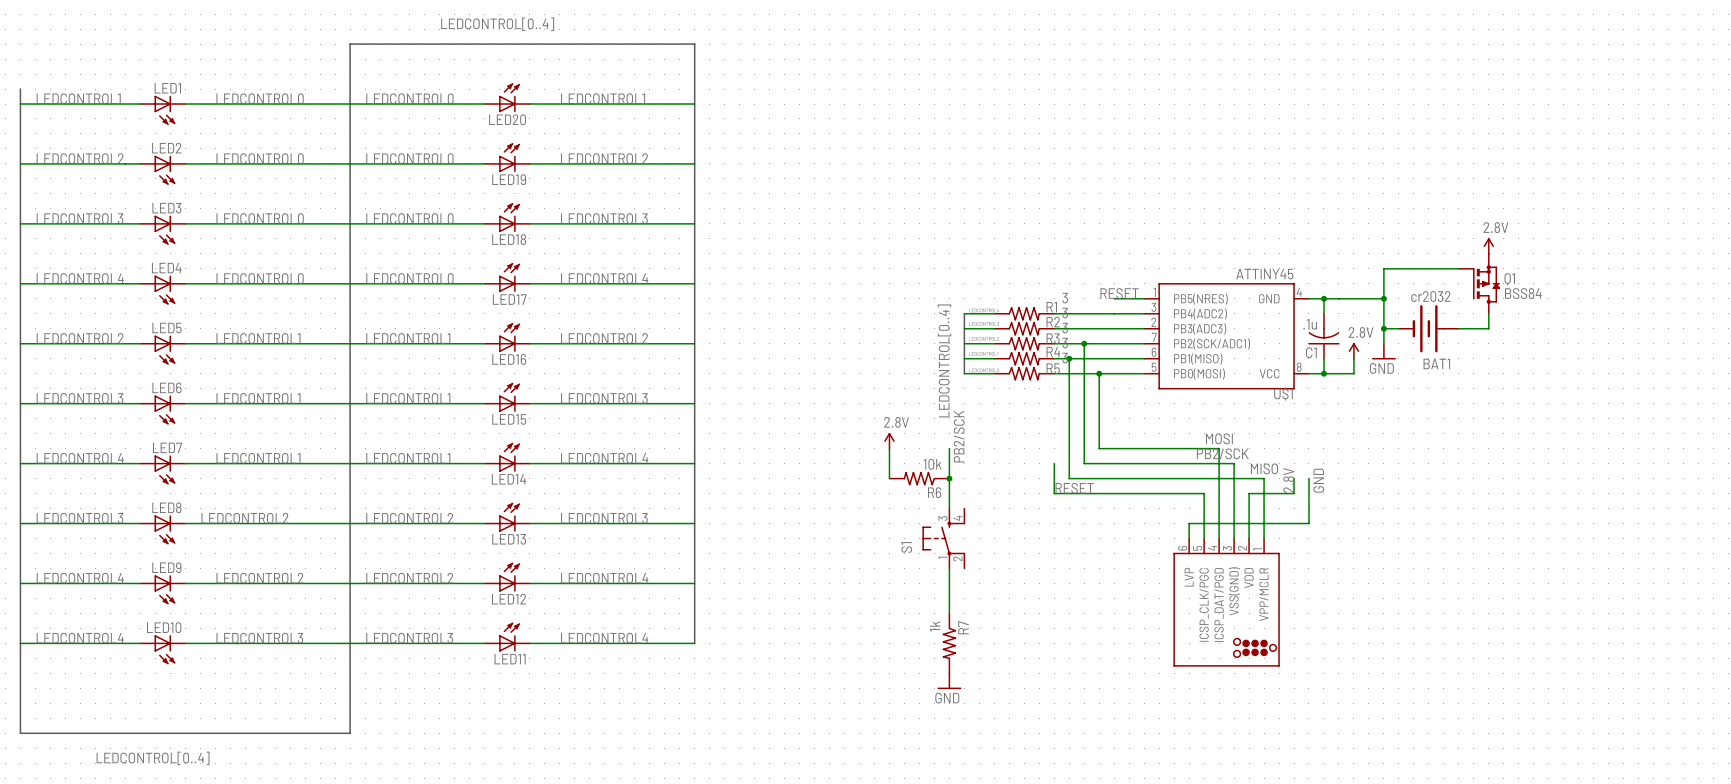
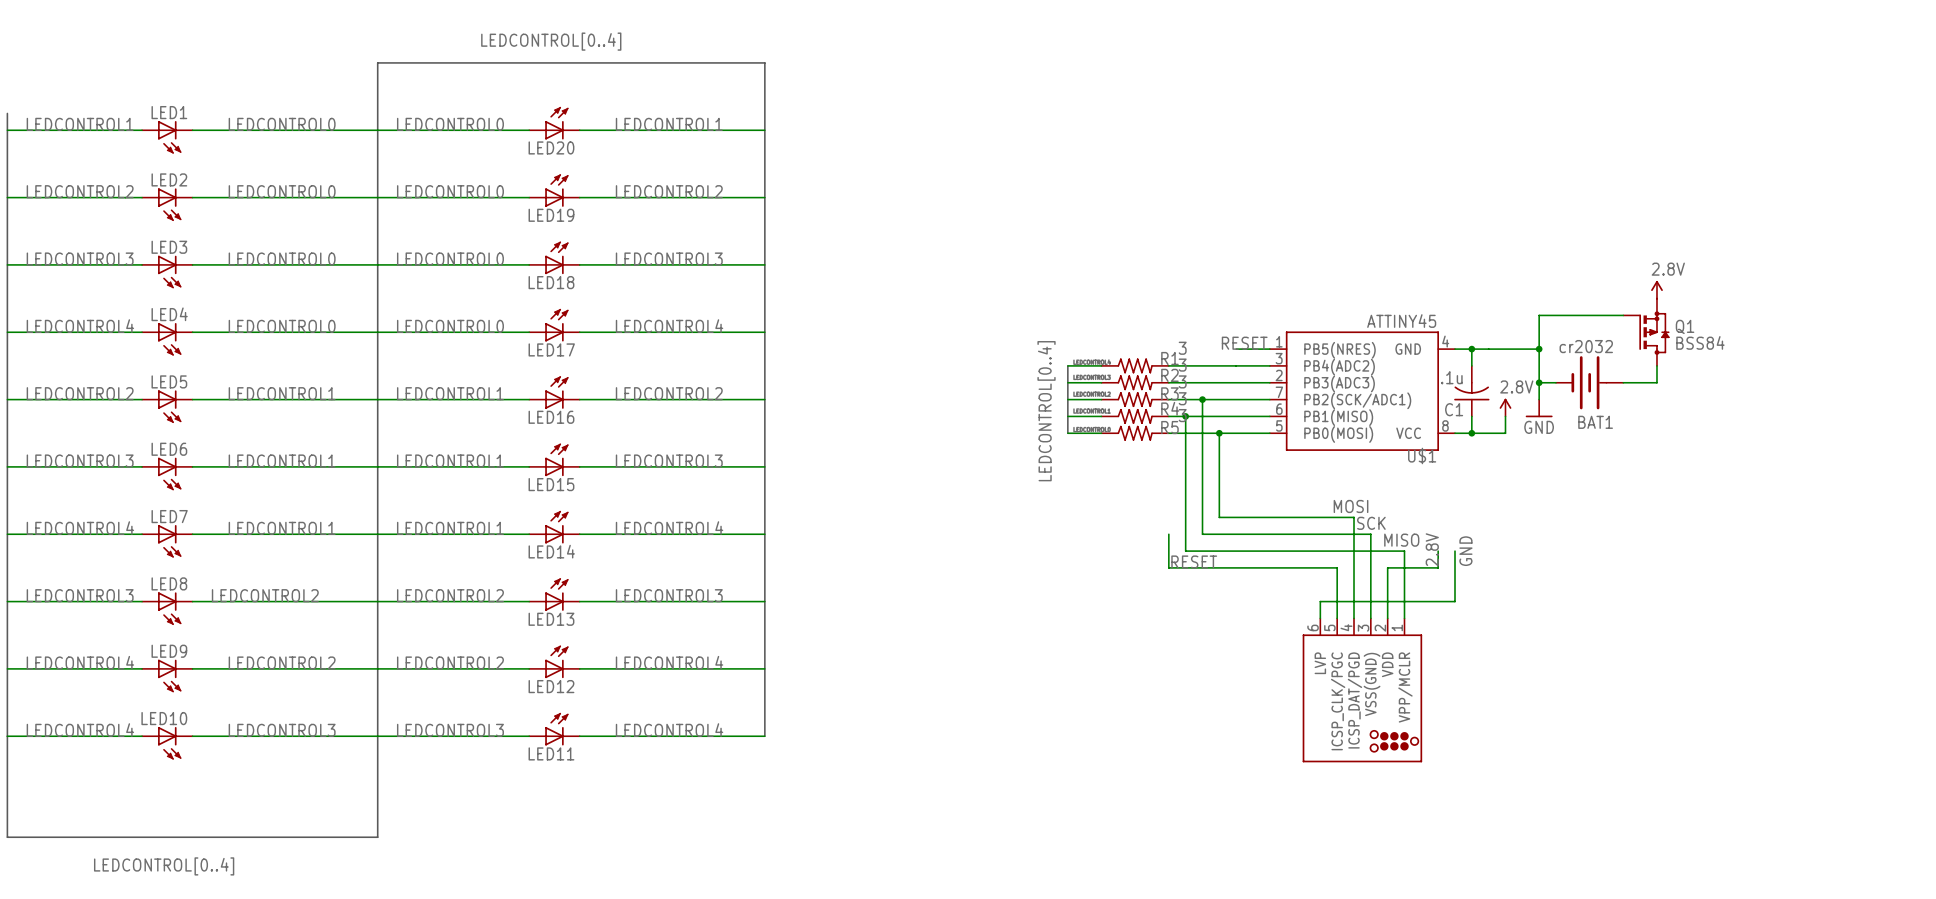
label: PB2/SCK (959, 436) -> none
power symbol: 2.8V (889, 440) -> none
wire: (889, 448) (889, 478) -> none
wire: (949, 448) (949, 508) -> none
label: PB2/SCK (1222, 453) -> SCK (1371, 523)
R6: 10k (919, 478) -> none
junction: (949, 478) -> none
S1: (943, 538) -> none
wire: (949, 568) (949, 613) -> none
R7: 1k (949, 643) -> none
power symbol: GND (949, 681) -> none

